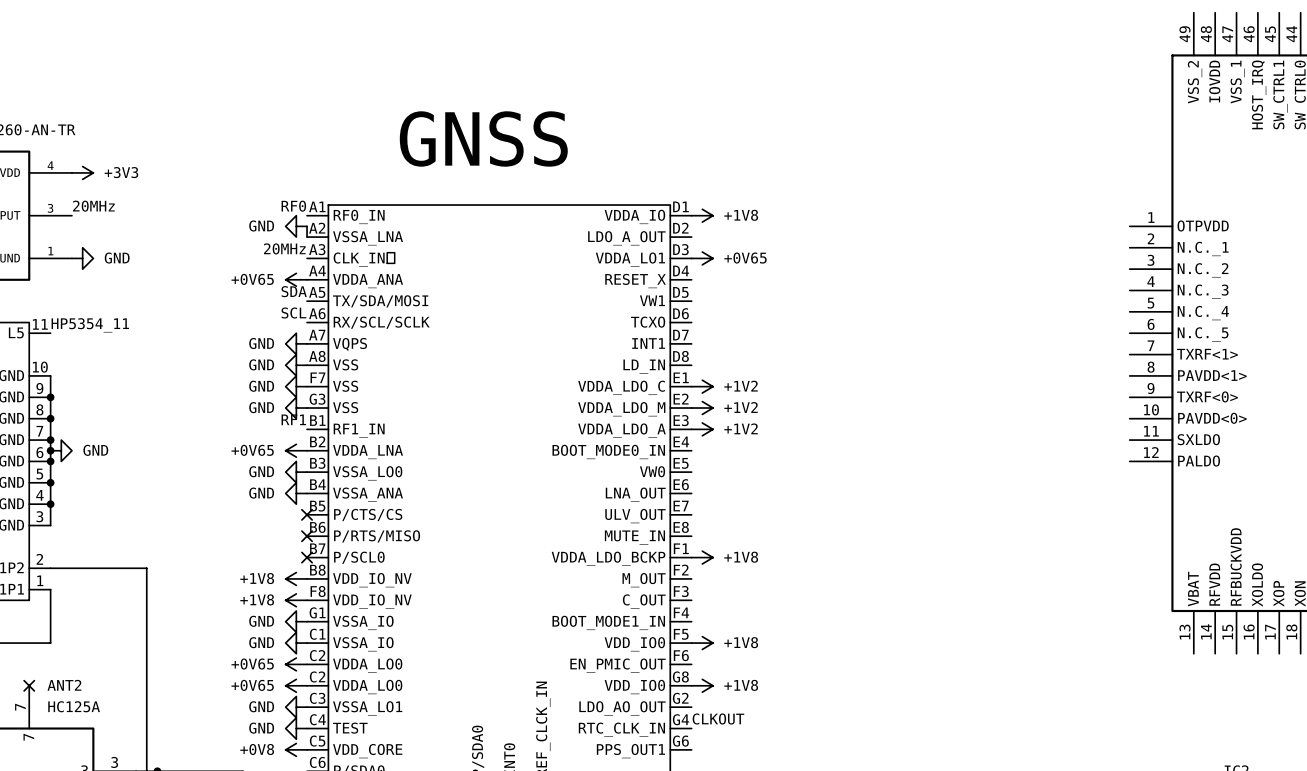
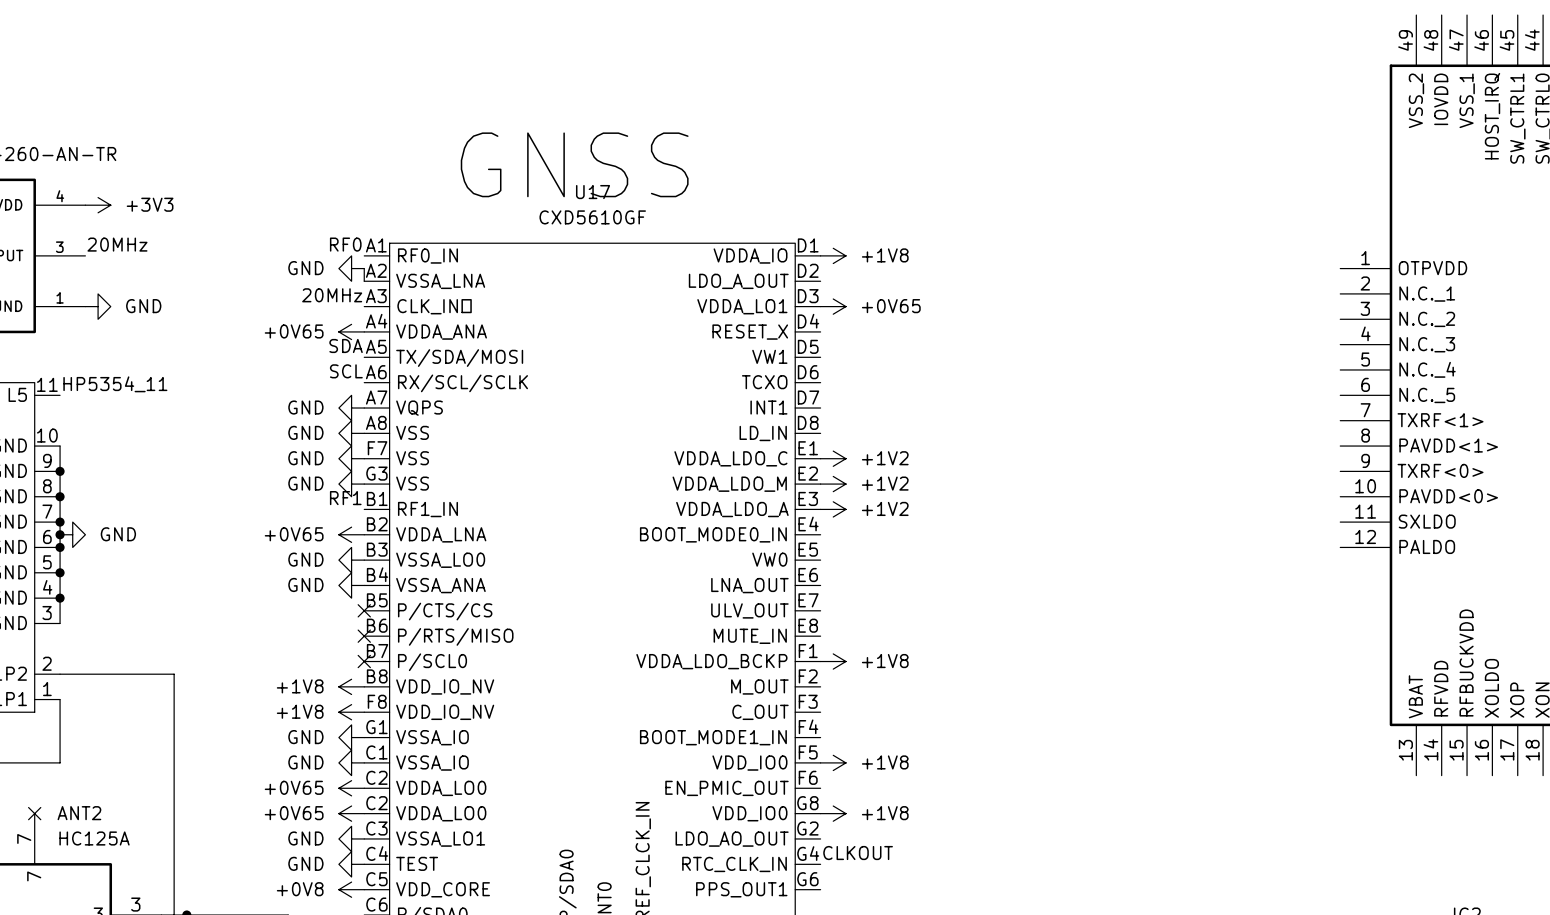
U17 name: none -> U17 (593, 192)
U17 value: none -> CXD5610GF (592, 217)

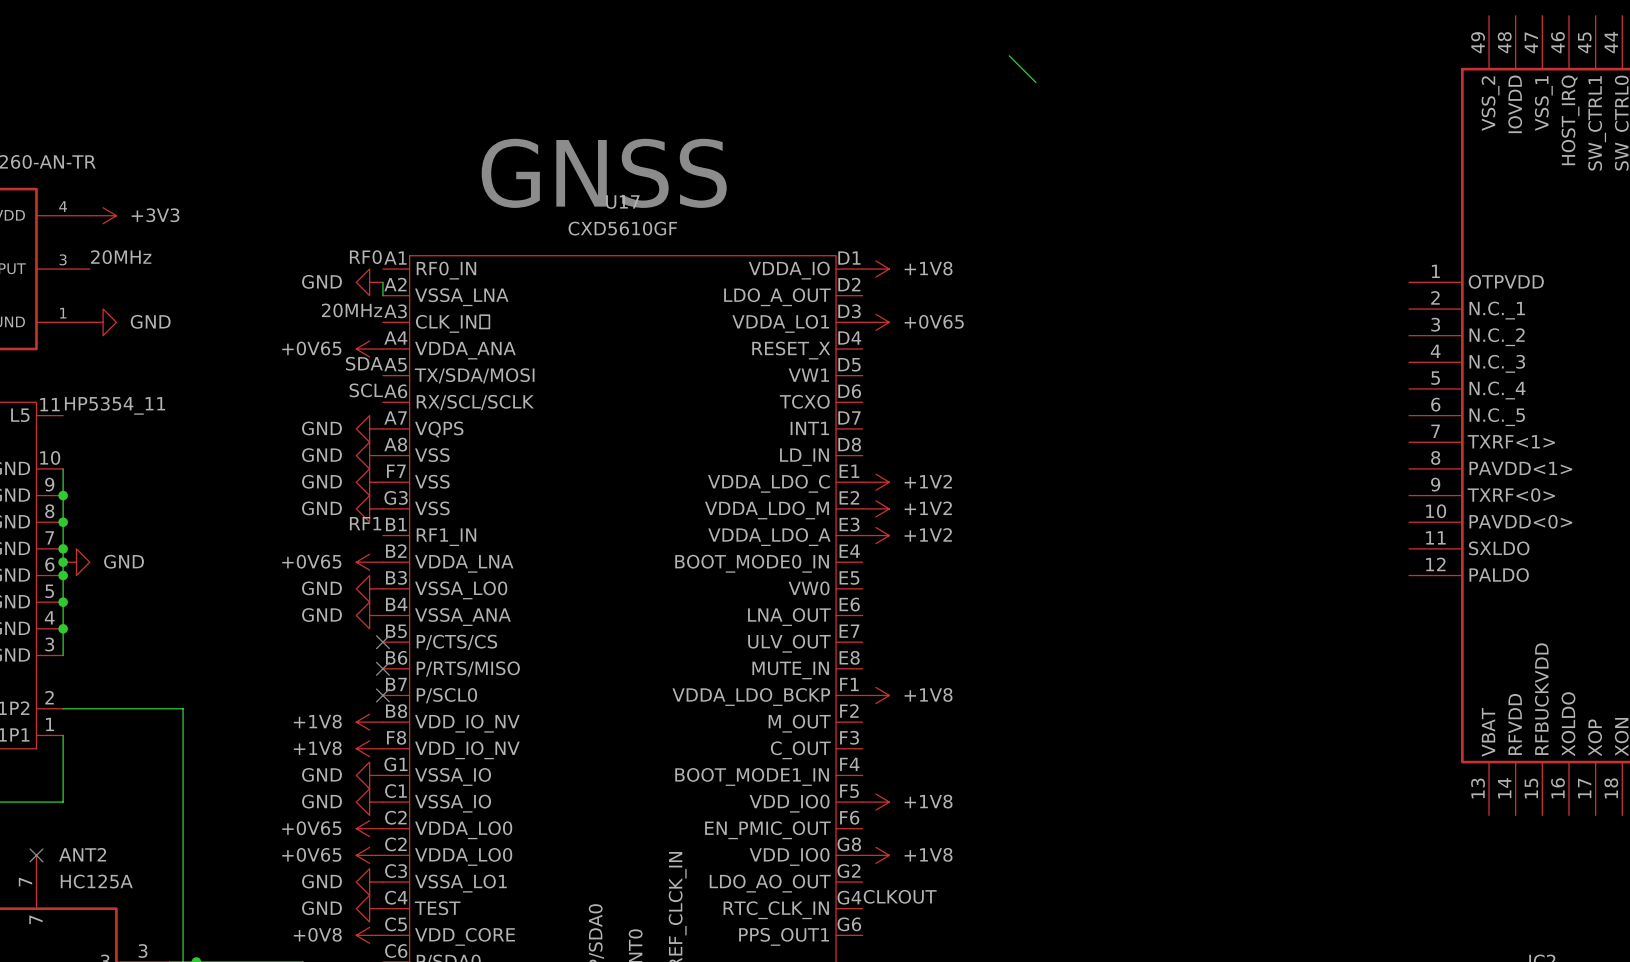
wire: none -> (1009, 55) (1035, 82)

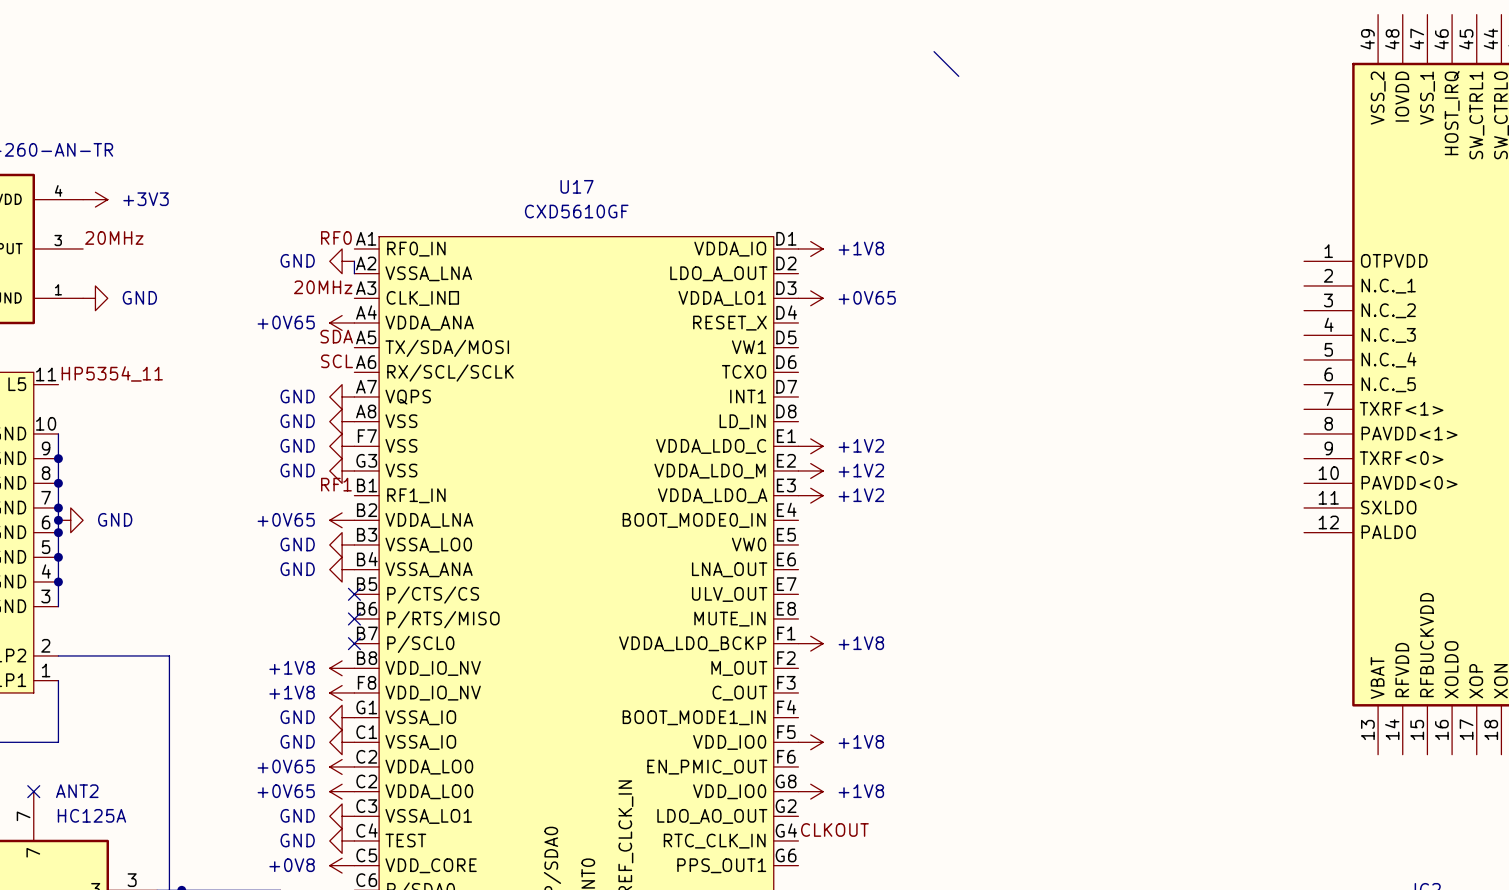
text: GNSS (604, 173) -> none

